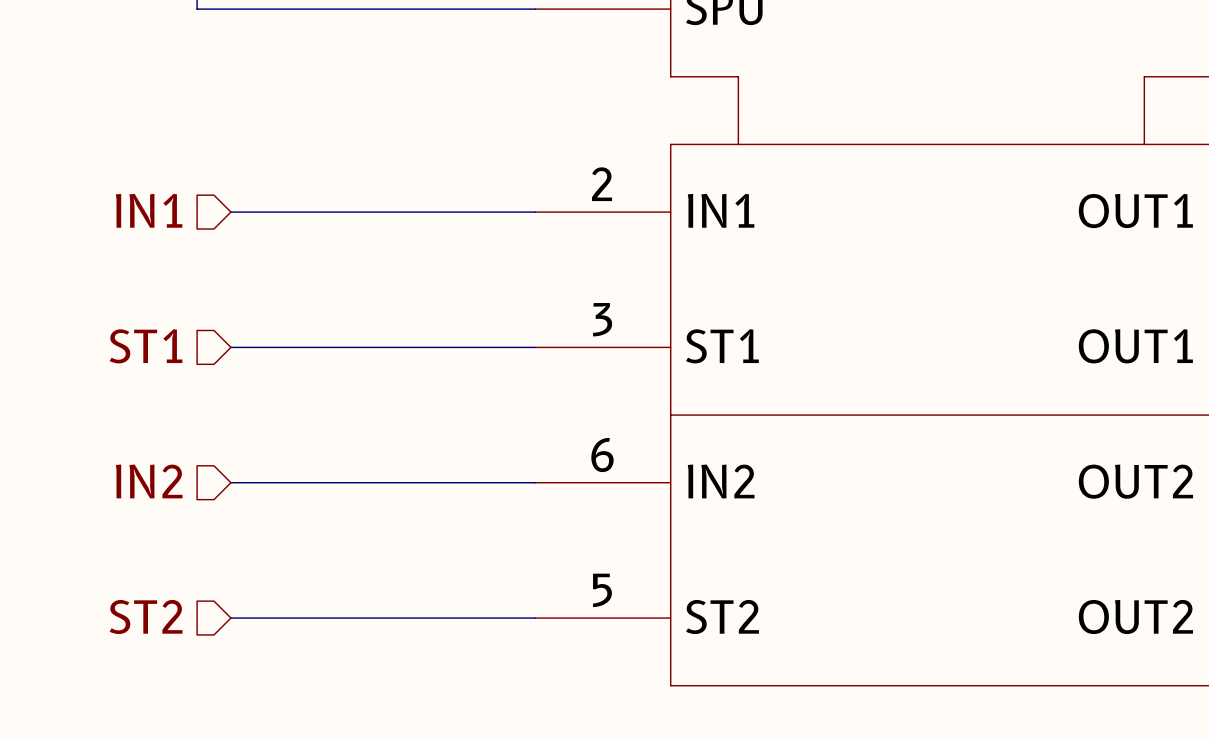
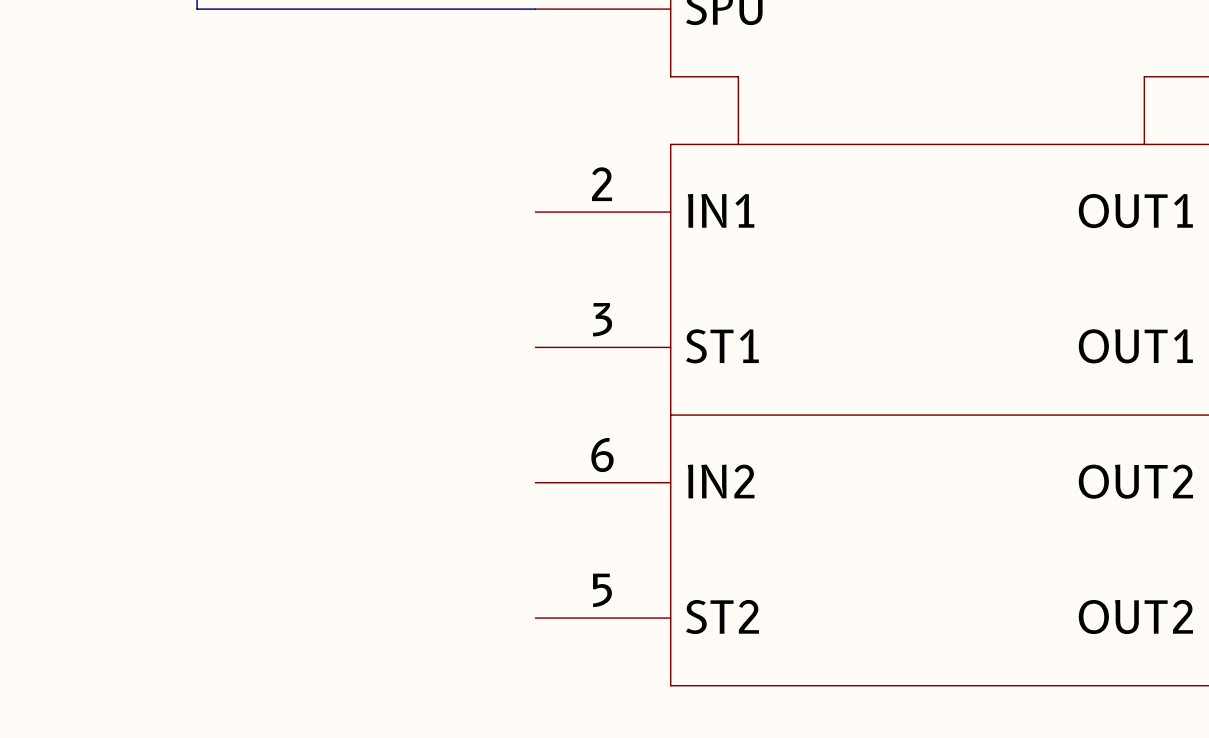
hierarchical label: IN1 (149, 210) -> none
wire: (230, 212) (535, 212) -> none
hierarchical label: ST1 (146, 346) -> none
wire: (230, 347) (535, 347) -> none
hierarchical label: IN2 (149, 481) -> none
wire: (230, 482) (535, 482) -> none
hierarchical label: ST2 (146, 617) -> none
wire: (230, 618) (535, 618) -> none

